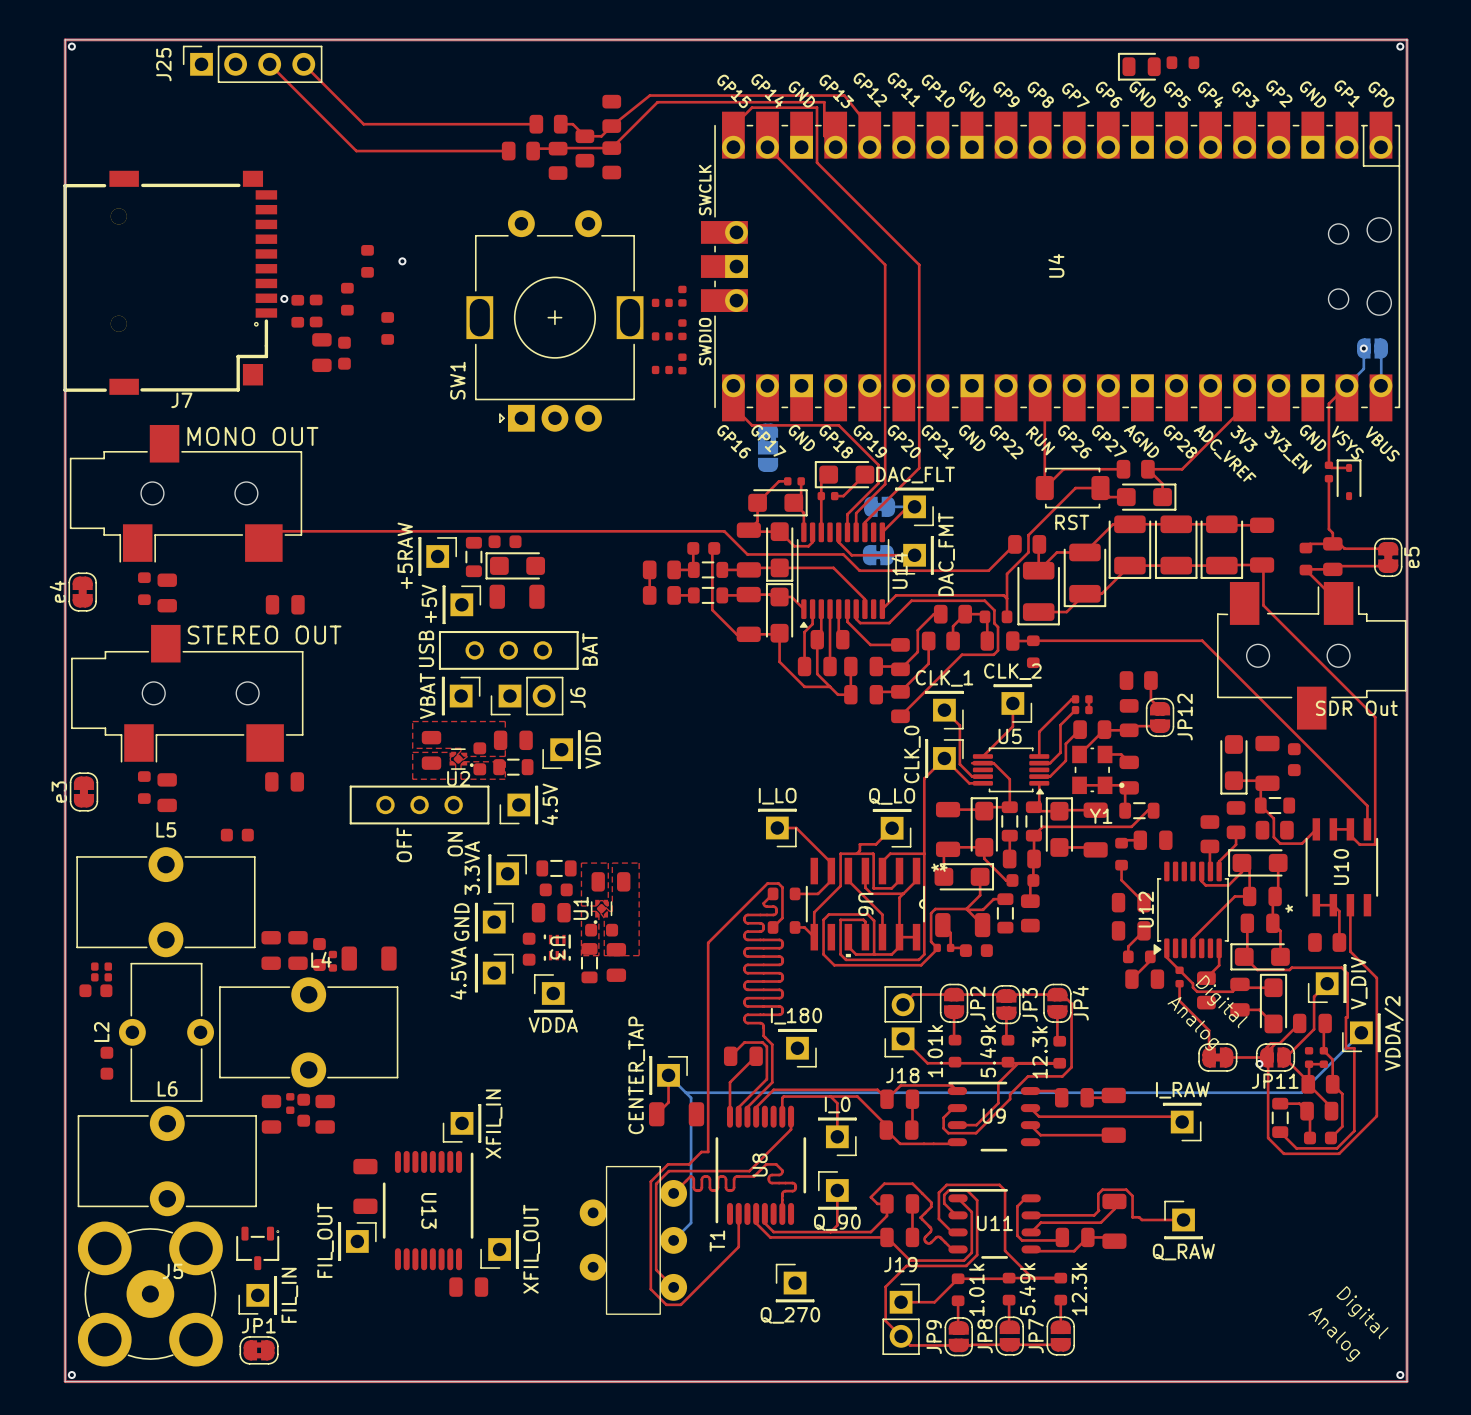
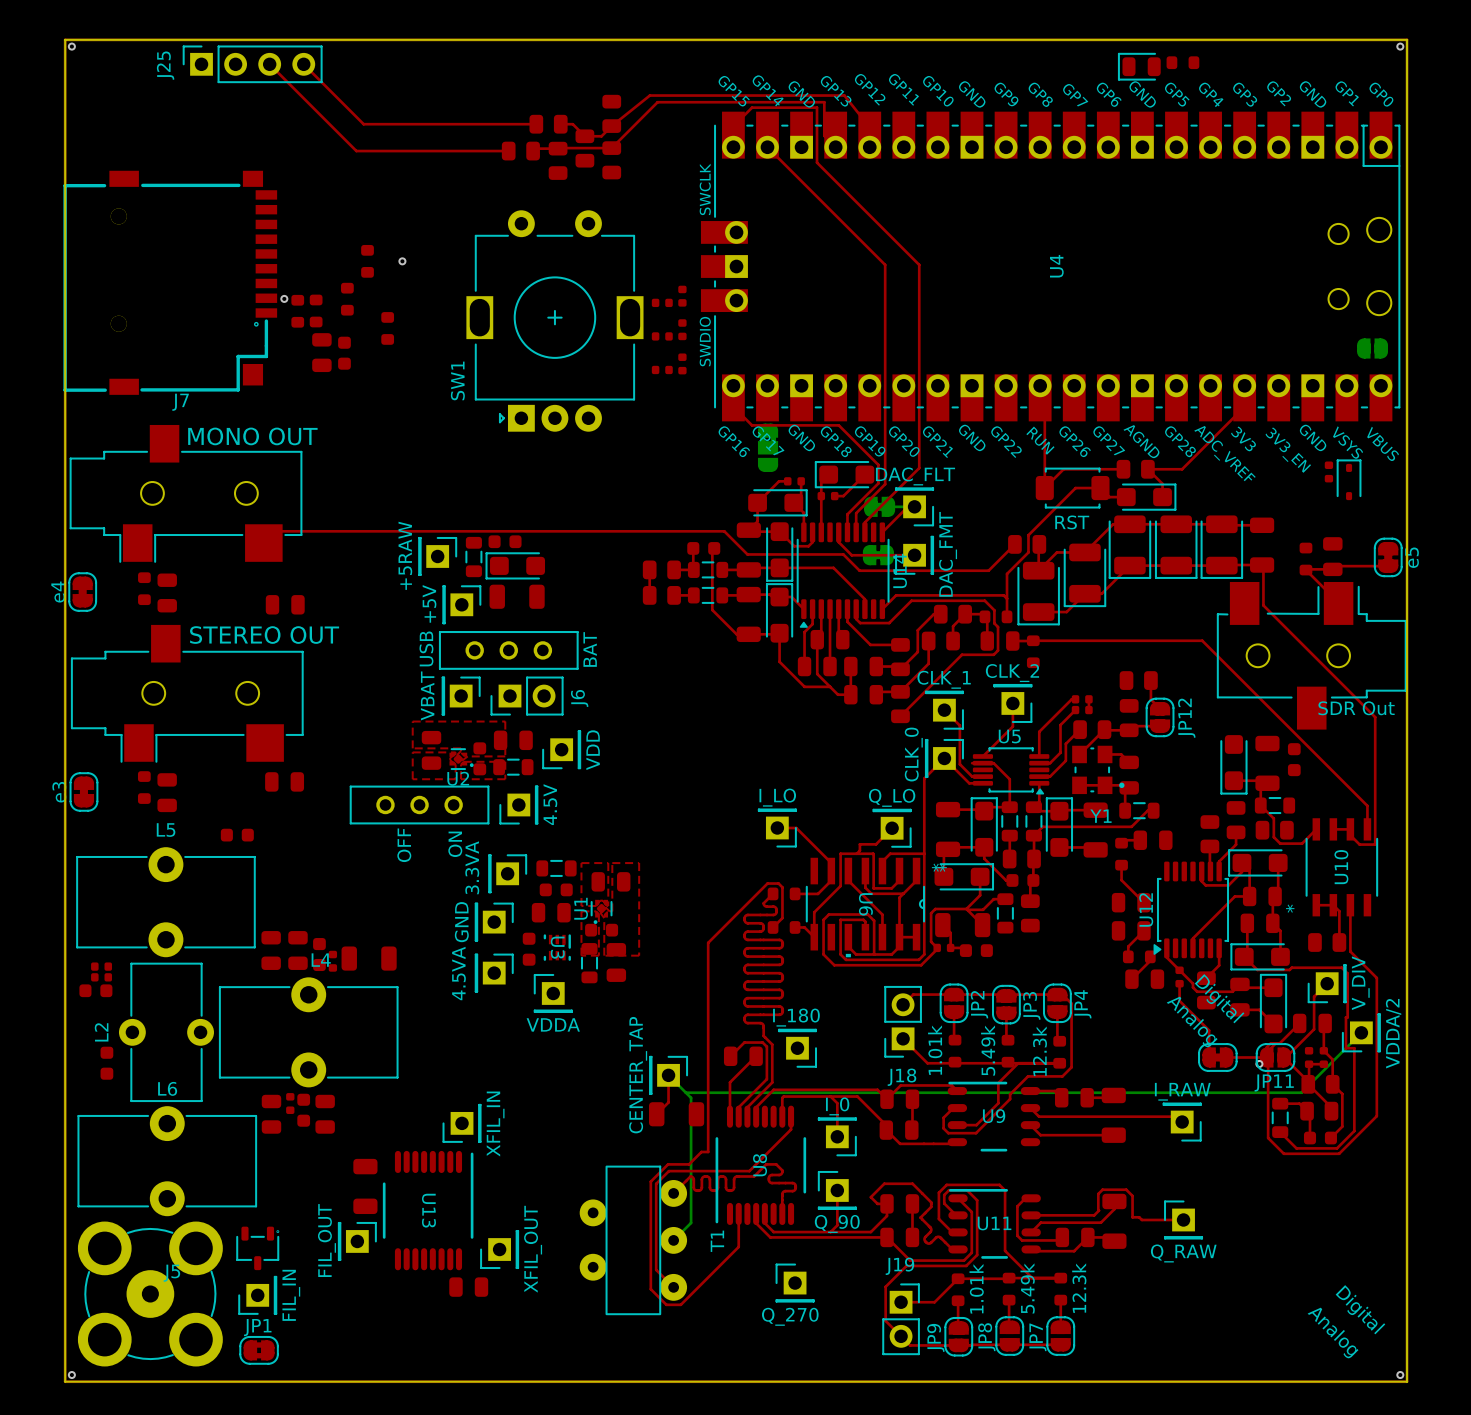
bottom track: (1363, 348) (1363, 368) (1346, 385) -> none
via: (1363, 348) -> none
bottom track: (1381, 348) (1380, 385) -> none
top track: (1346, 385) (1328, 403) (1328, 465) (1331, 467) (1349, 467) -> none
top track: (1328, 478) (1328, 529) (1332, 533) (1332, 543) -> none
top track: (1305, 548) (1310, 543) (1339, 543) (1344, 548) (1388, 548) -> none

